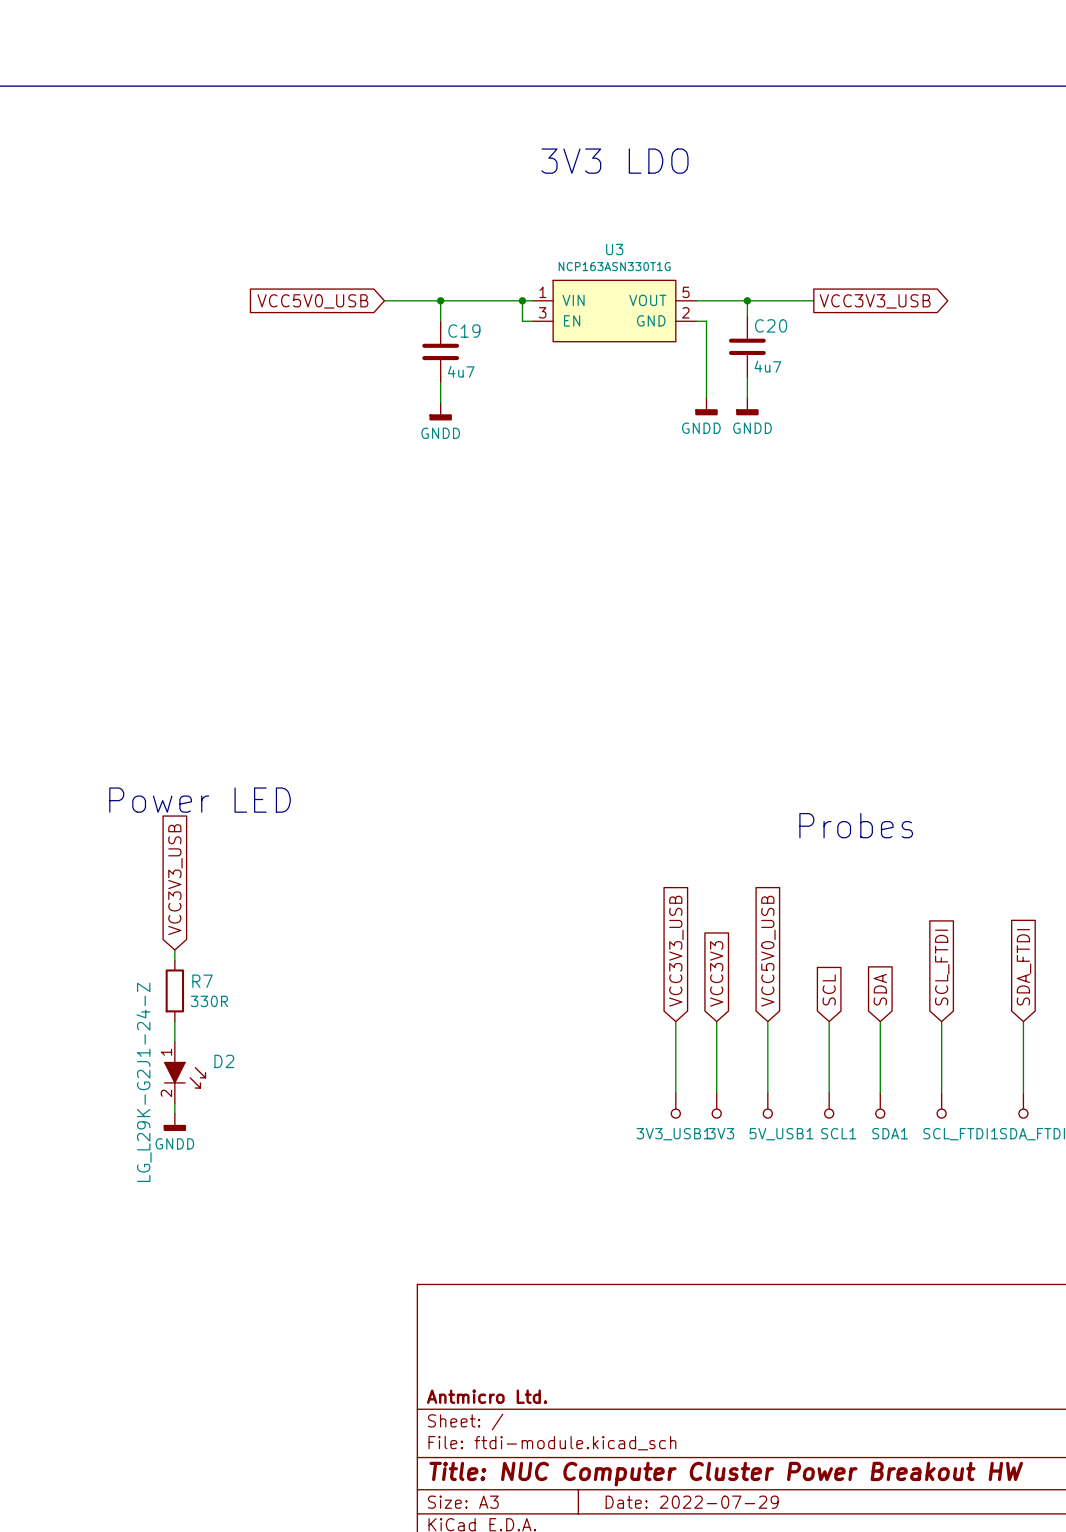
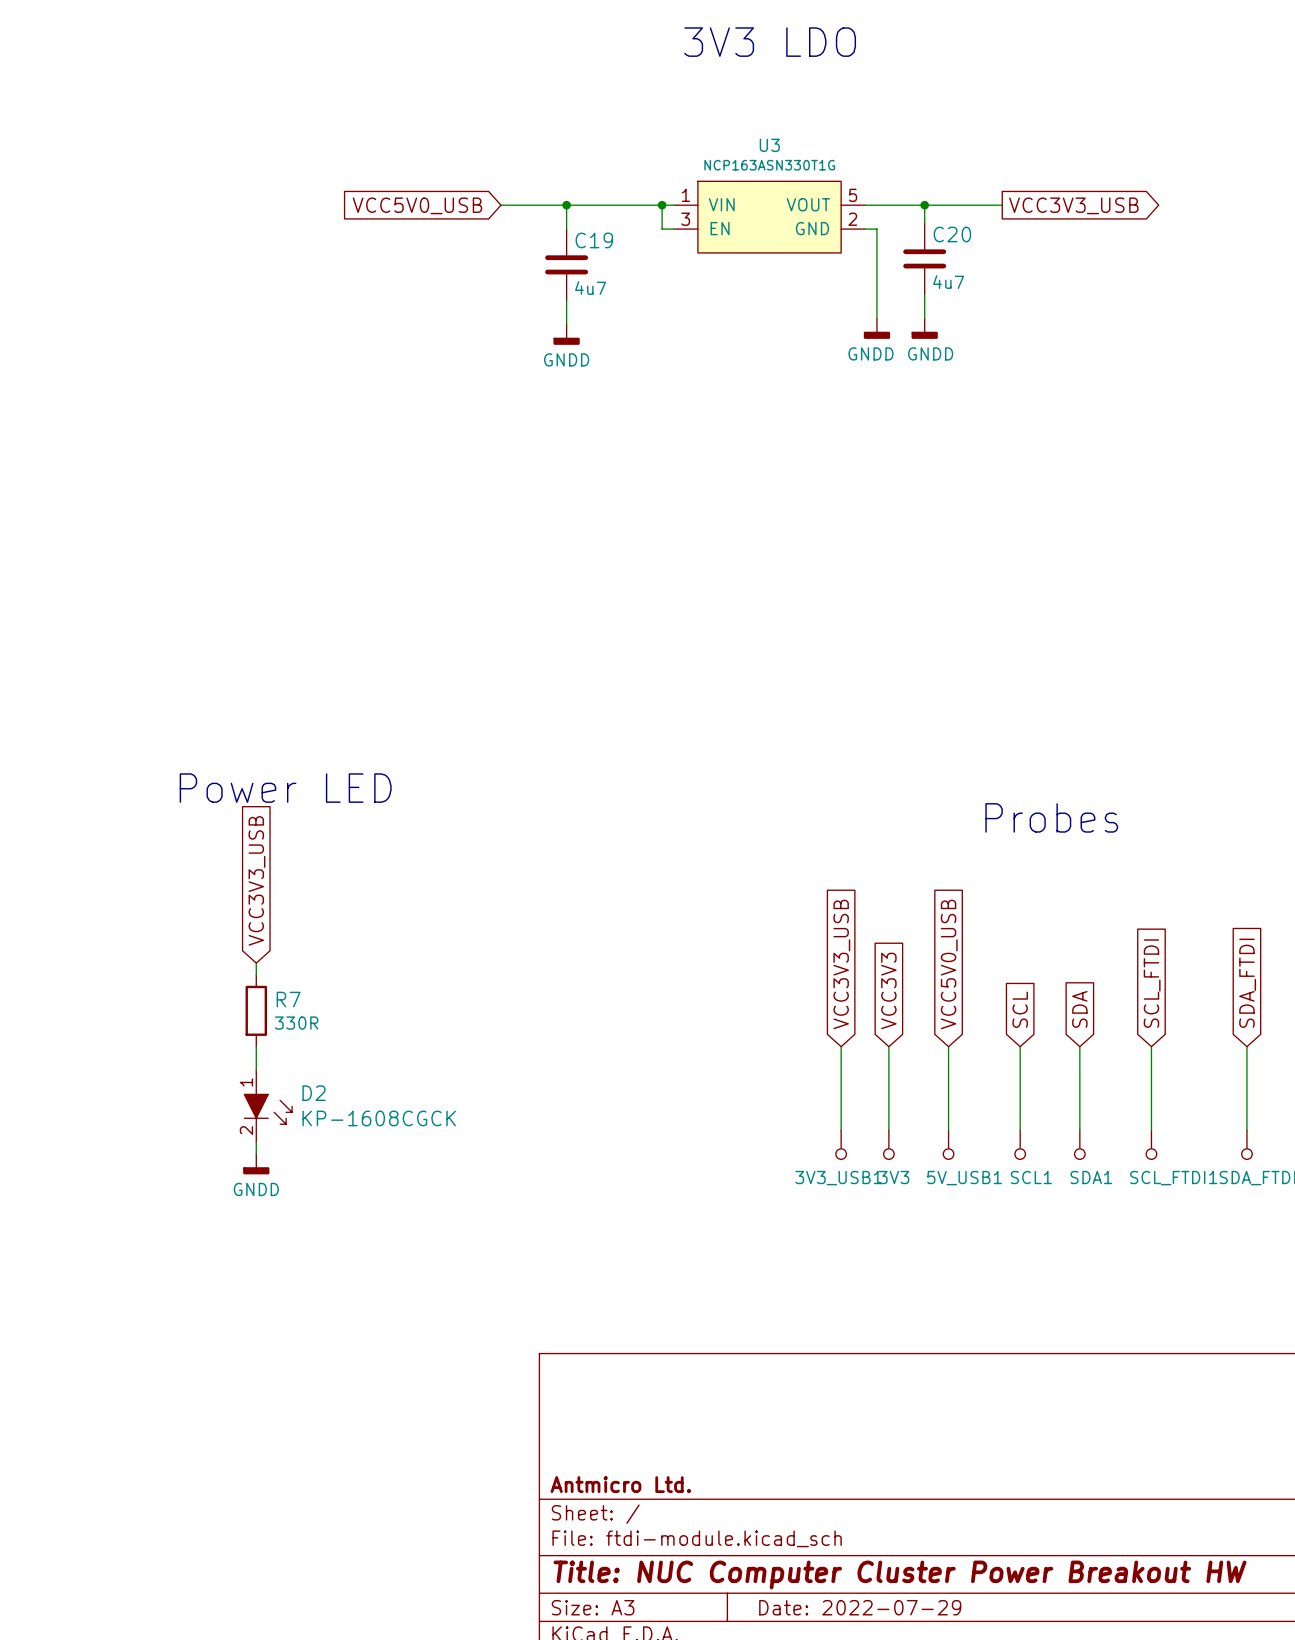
D2 value: LG_L29K-G2J1-24-Z (144, 1082) -> KP-1608CGCK (379, 1118)

